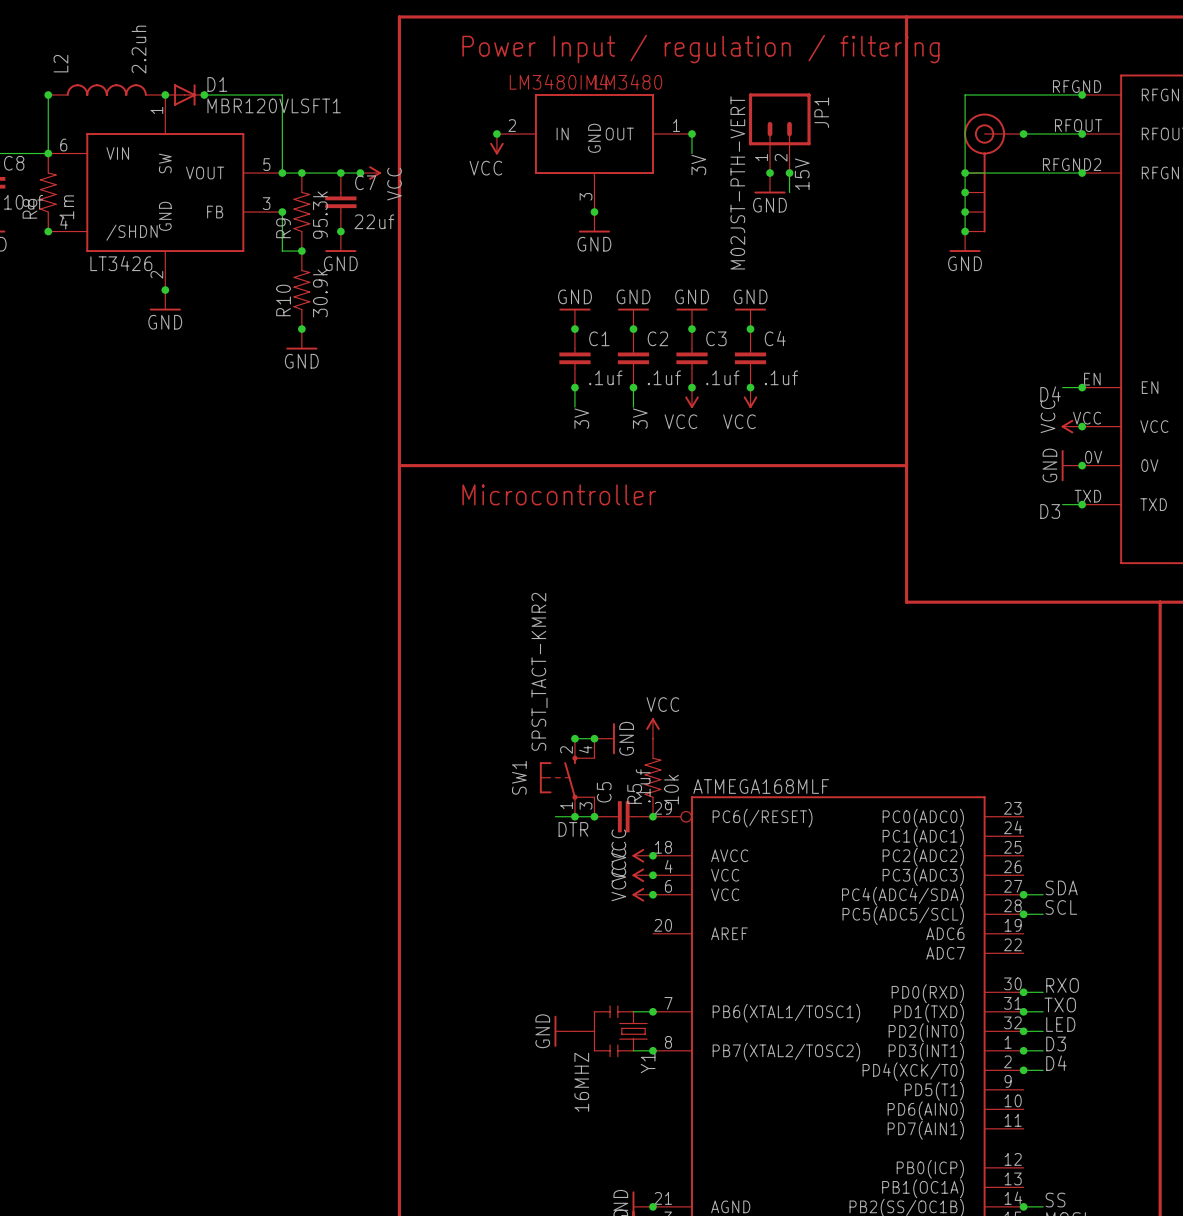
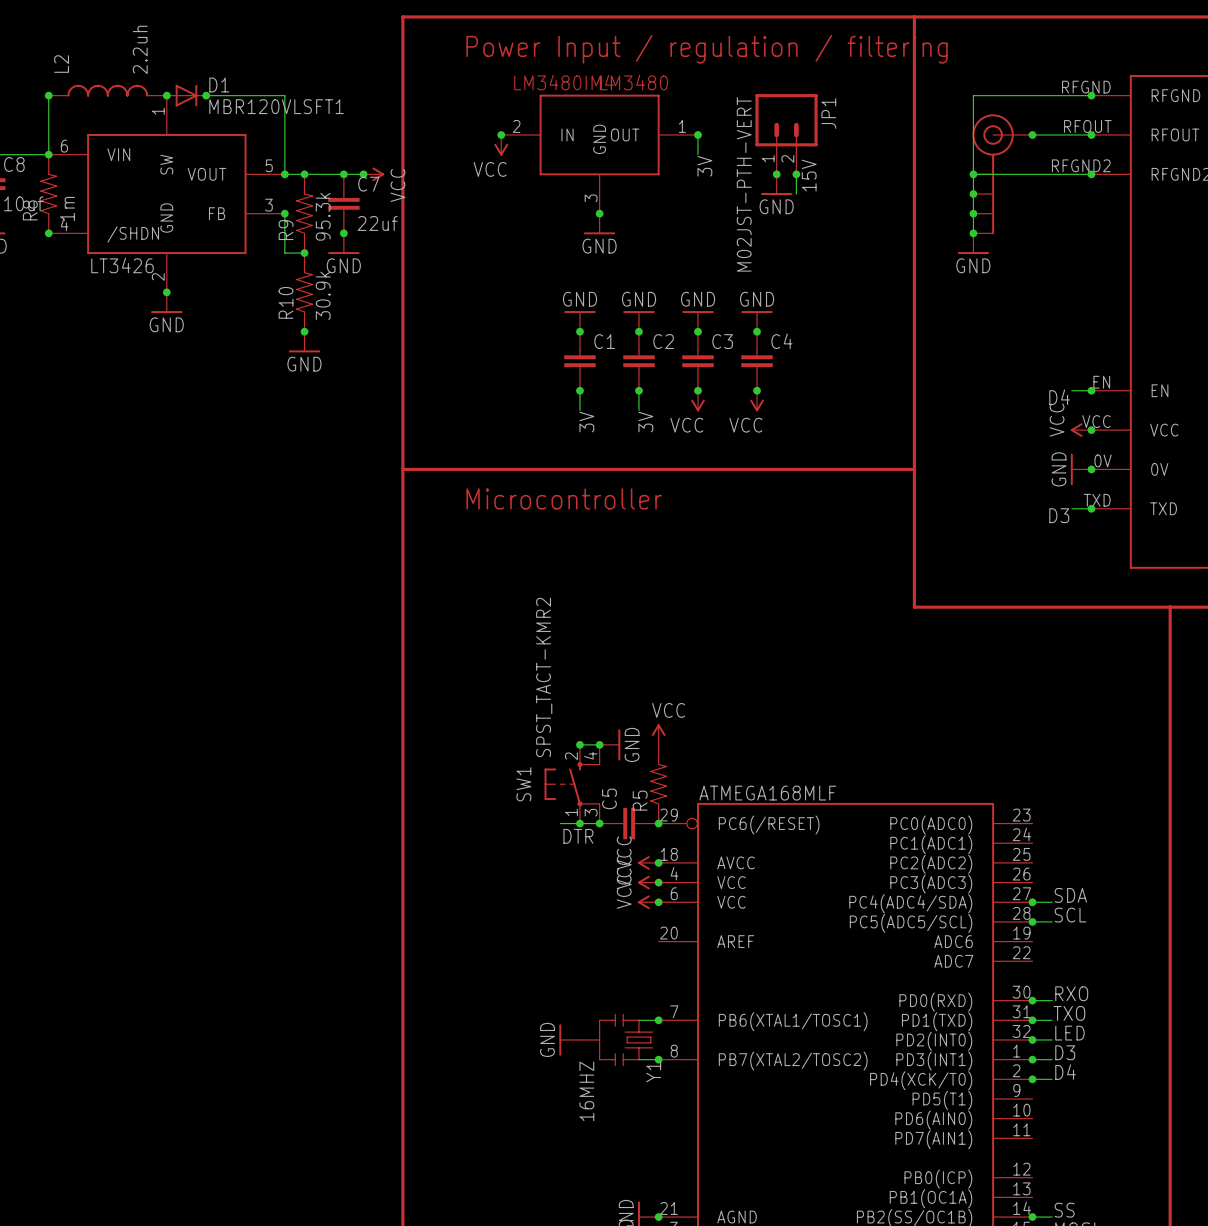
C1 value: .1uf (605, 377) -> none
C2 value: .1uf (664, 377) -> none
C3 value: .1uf (722, 377) -> none
C4 value: .1uf (781, 377) -> none
C5 value: .1uf (643, 785) -> none
R5 value: 10k (671, 789) -> none

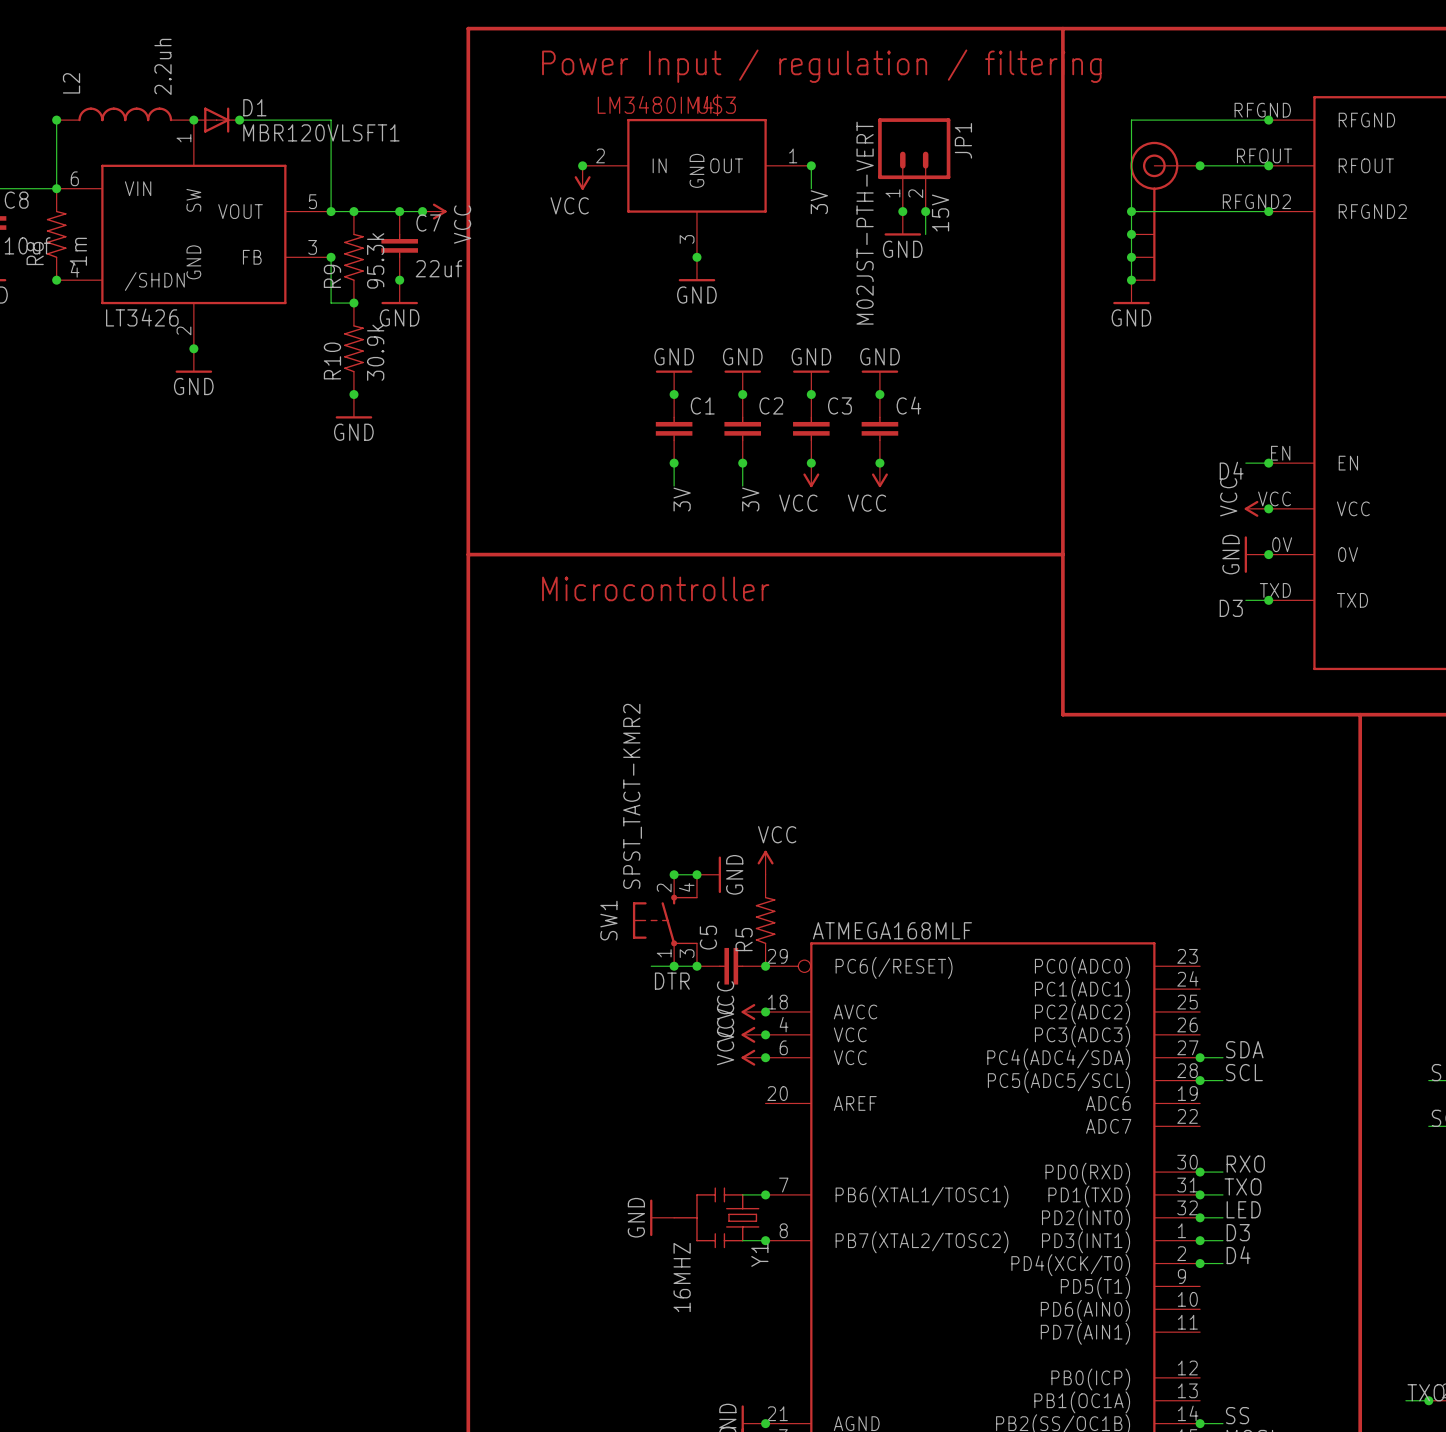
LM3480 name: LM3480 (634, 82) -> U$3 (717, 105)

